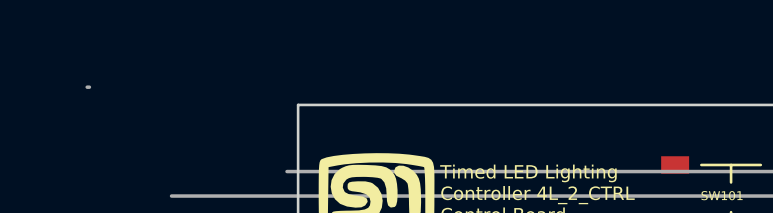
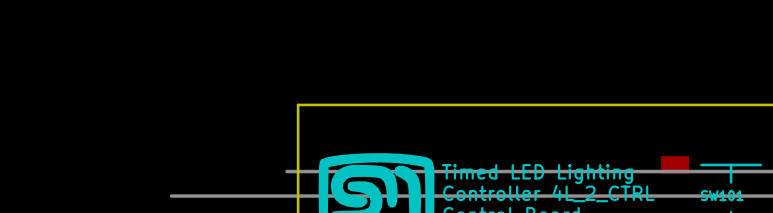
line: (87, 87) (89, 87) -> none

